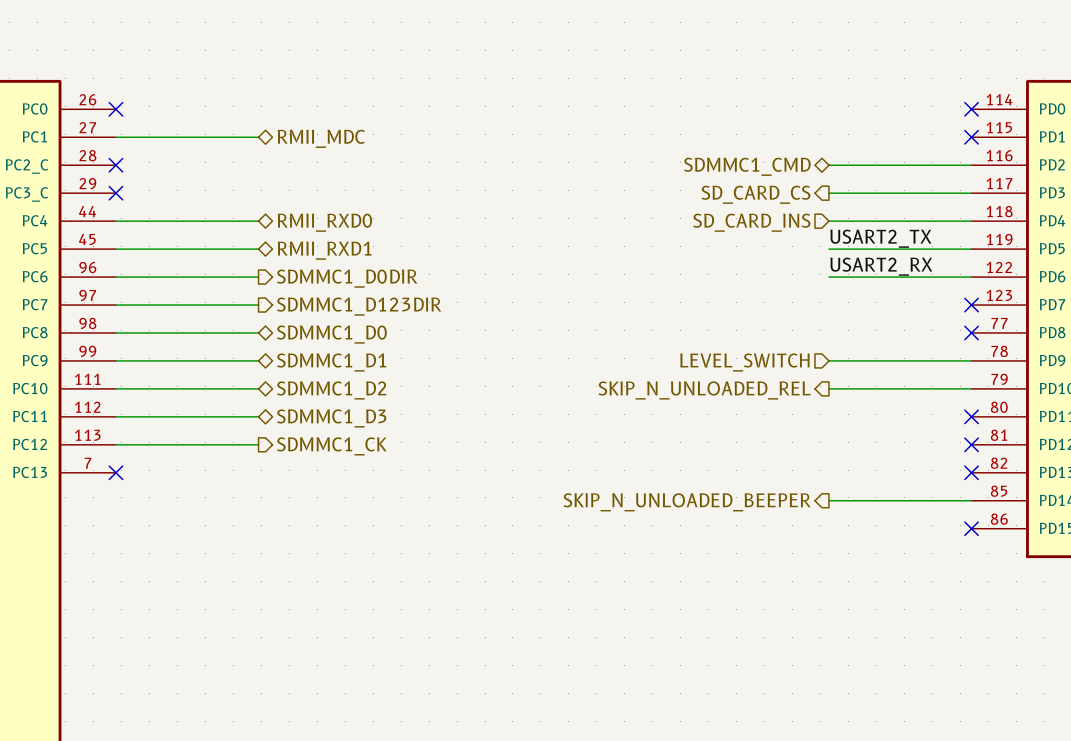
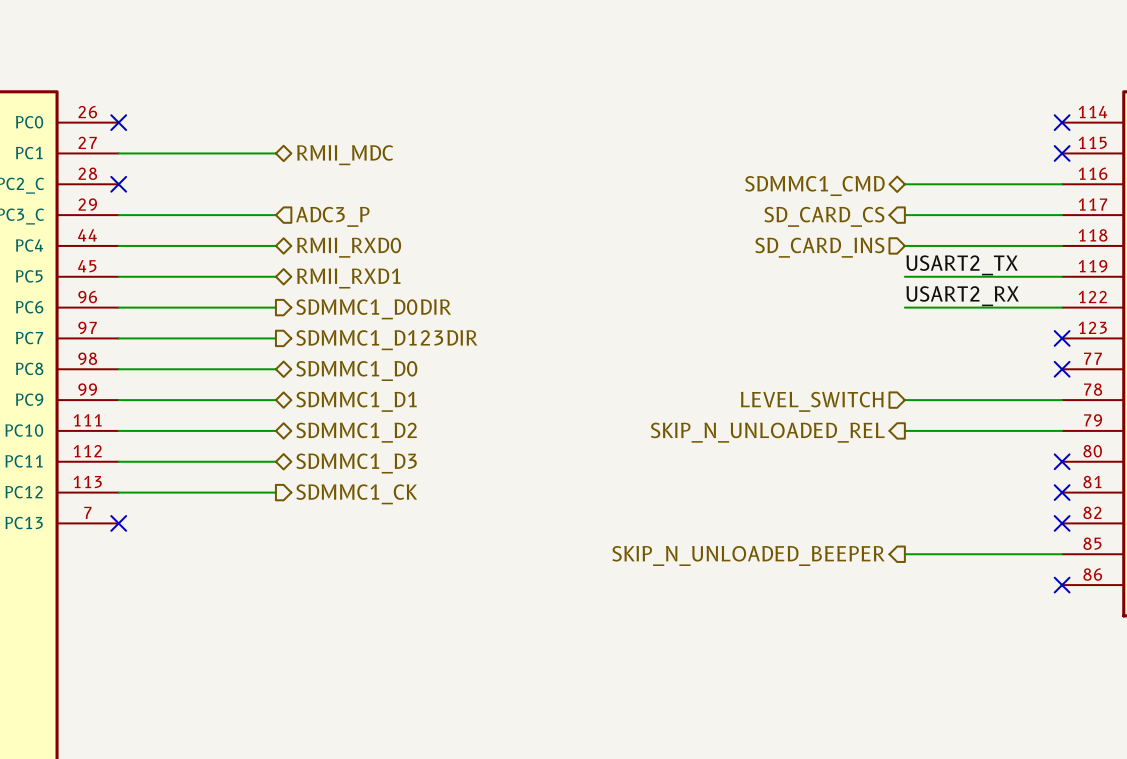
wire: none -> (118, 215) (275, 215)
no-connect mark: (115, 193) -> none
hierarchical label: none -> ADC3_P (332, 216)

